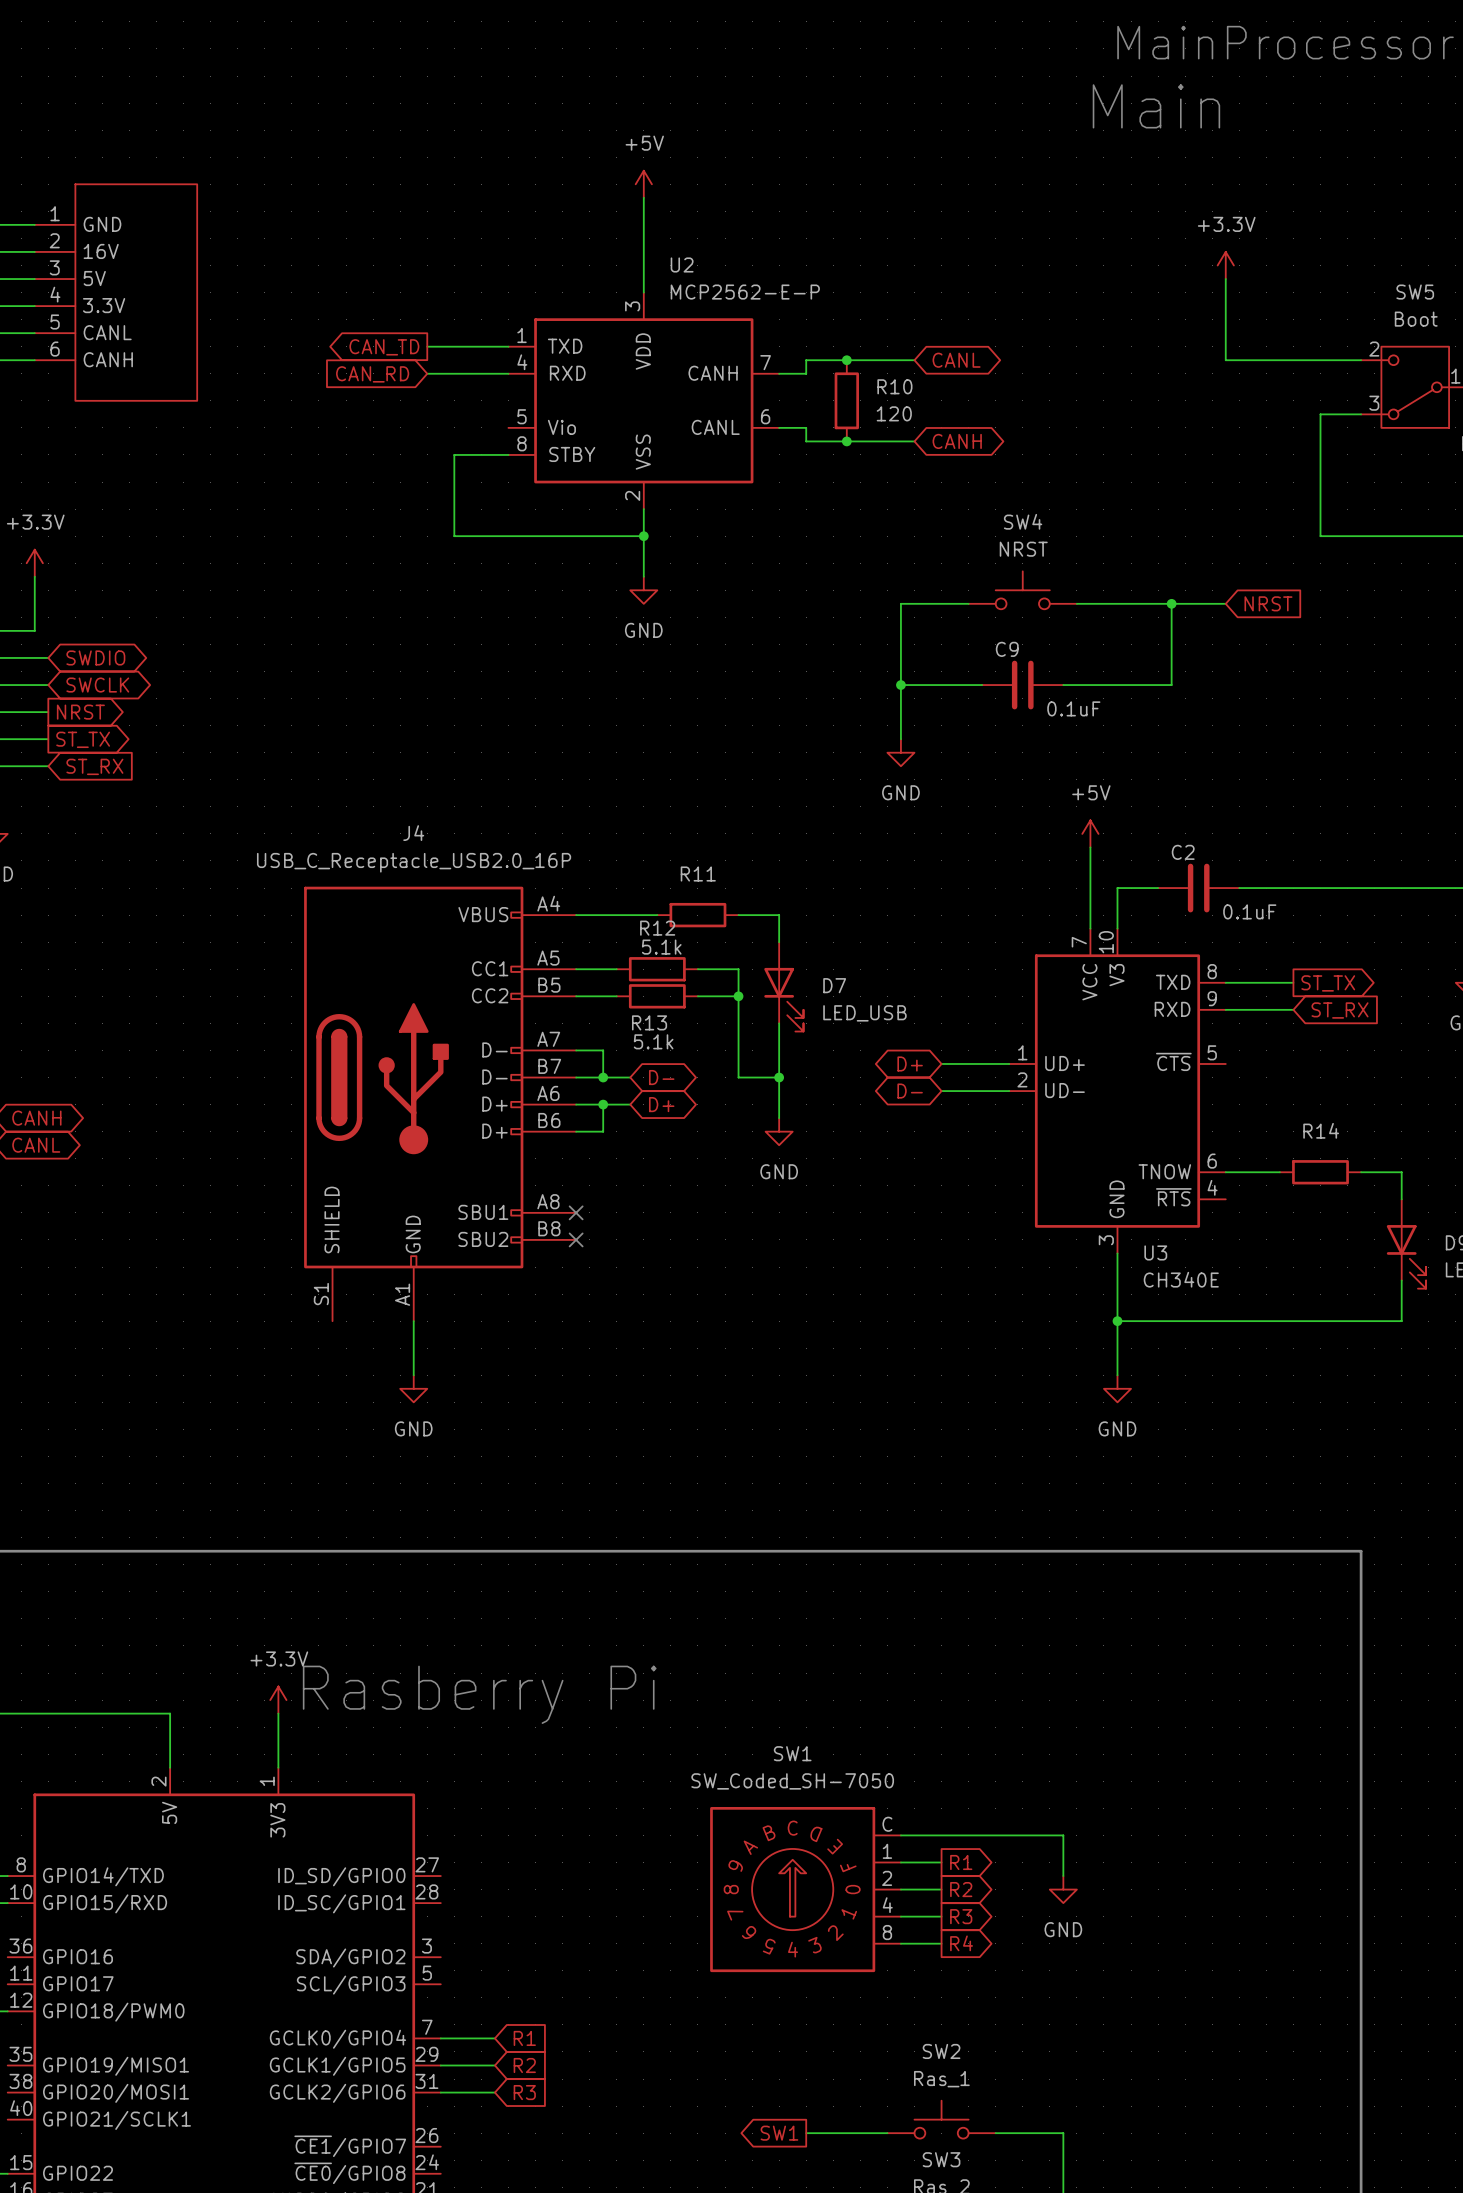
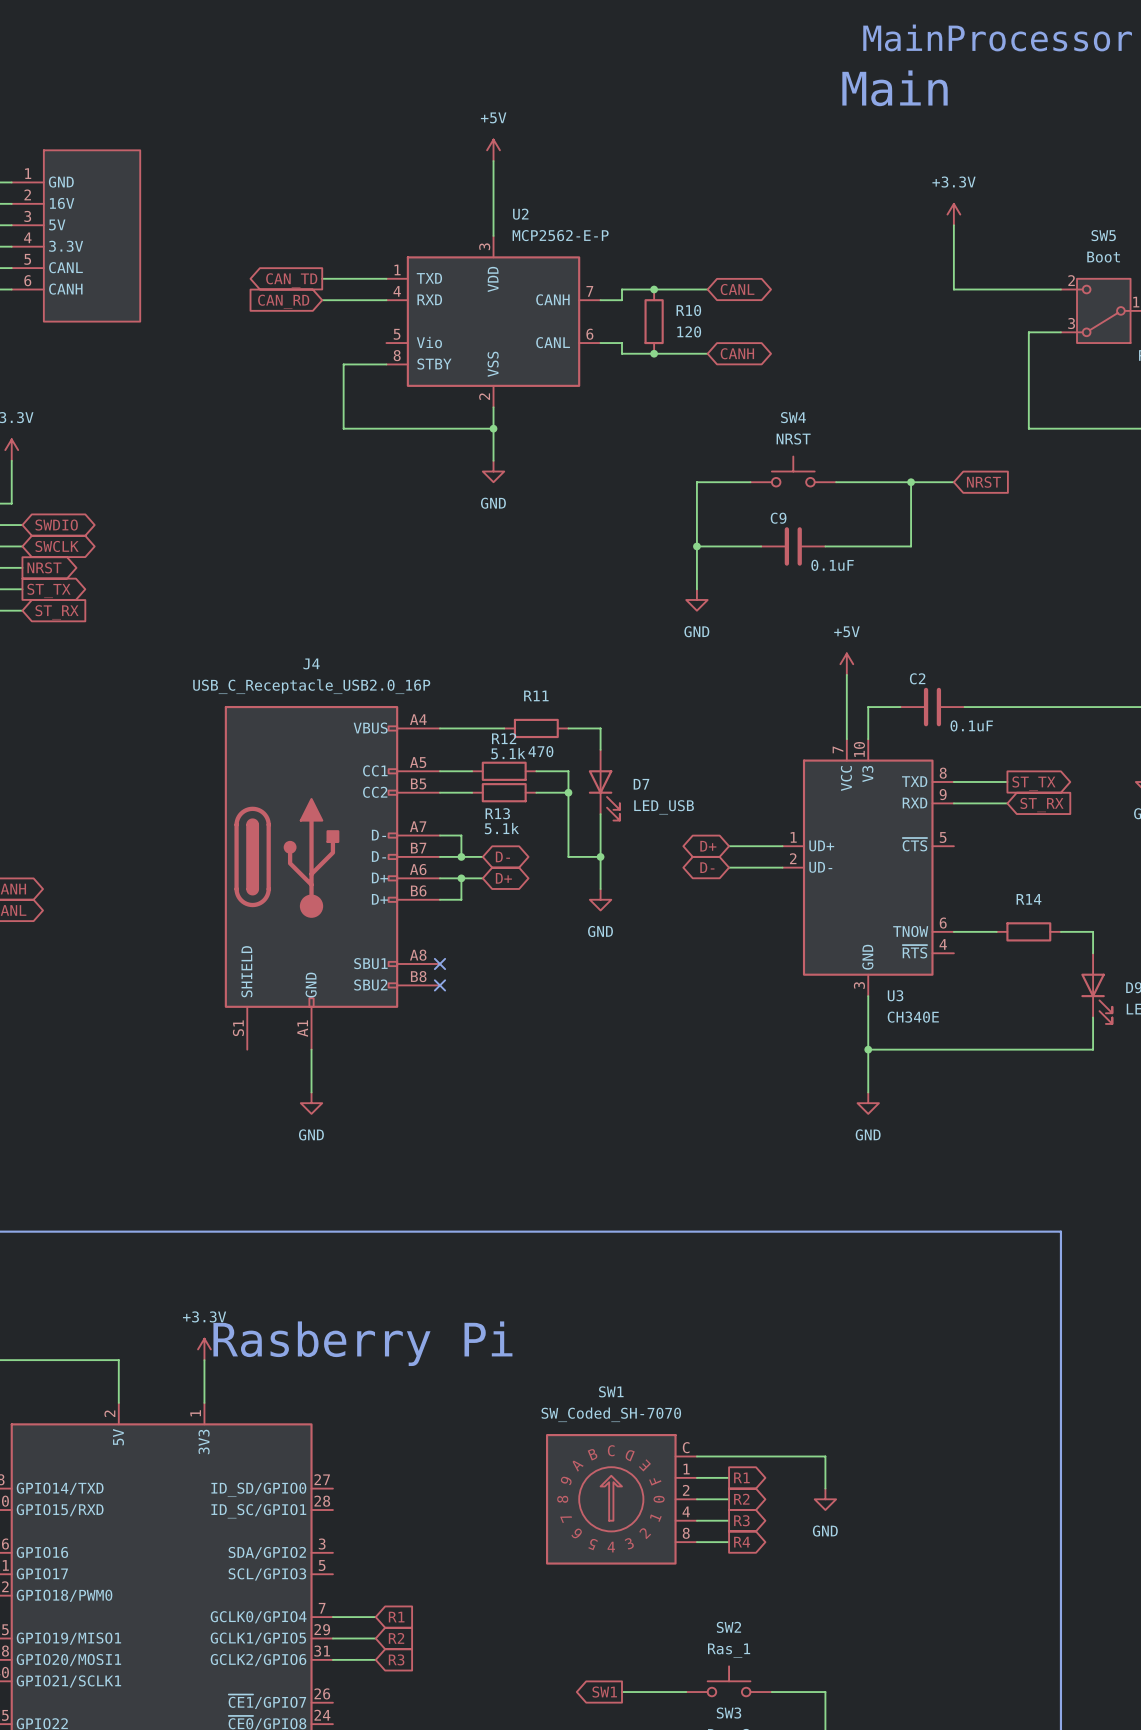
R11 value: none -> 470 (540, 751)
SW1 value: SW_Coded_SH-7050 (792, 1781) -> SW_Coded_SH-7070 (611, 1414)

